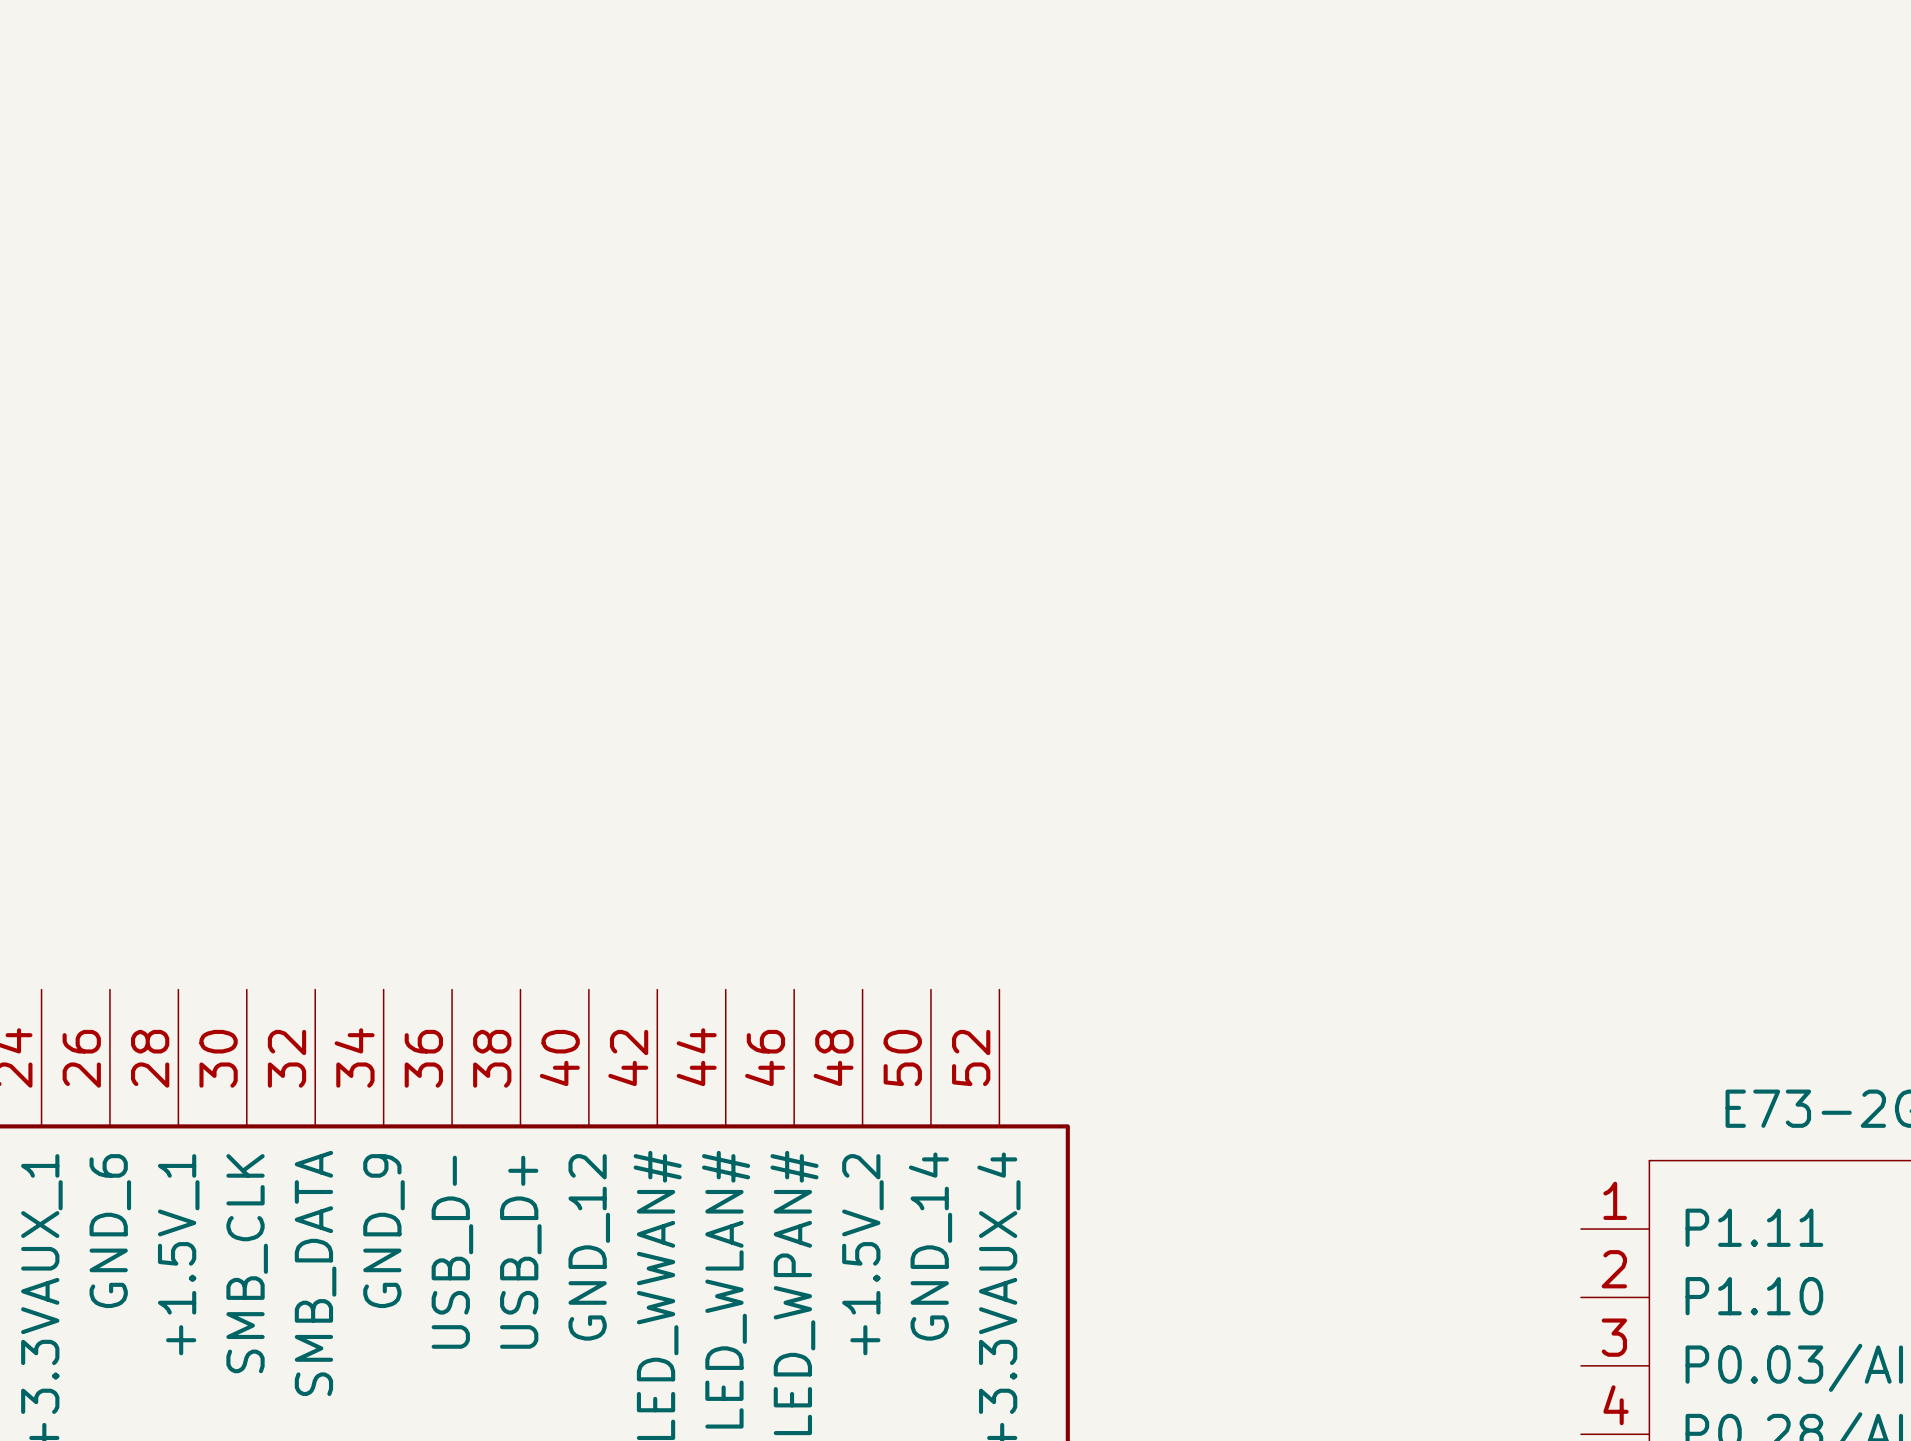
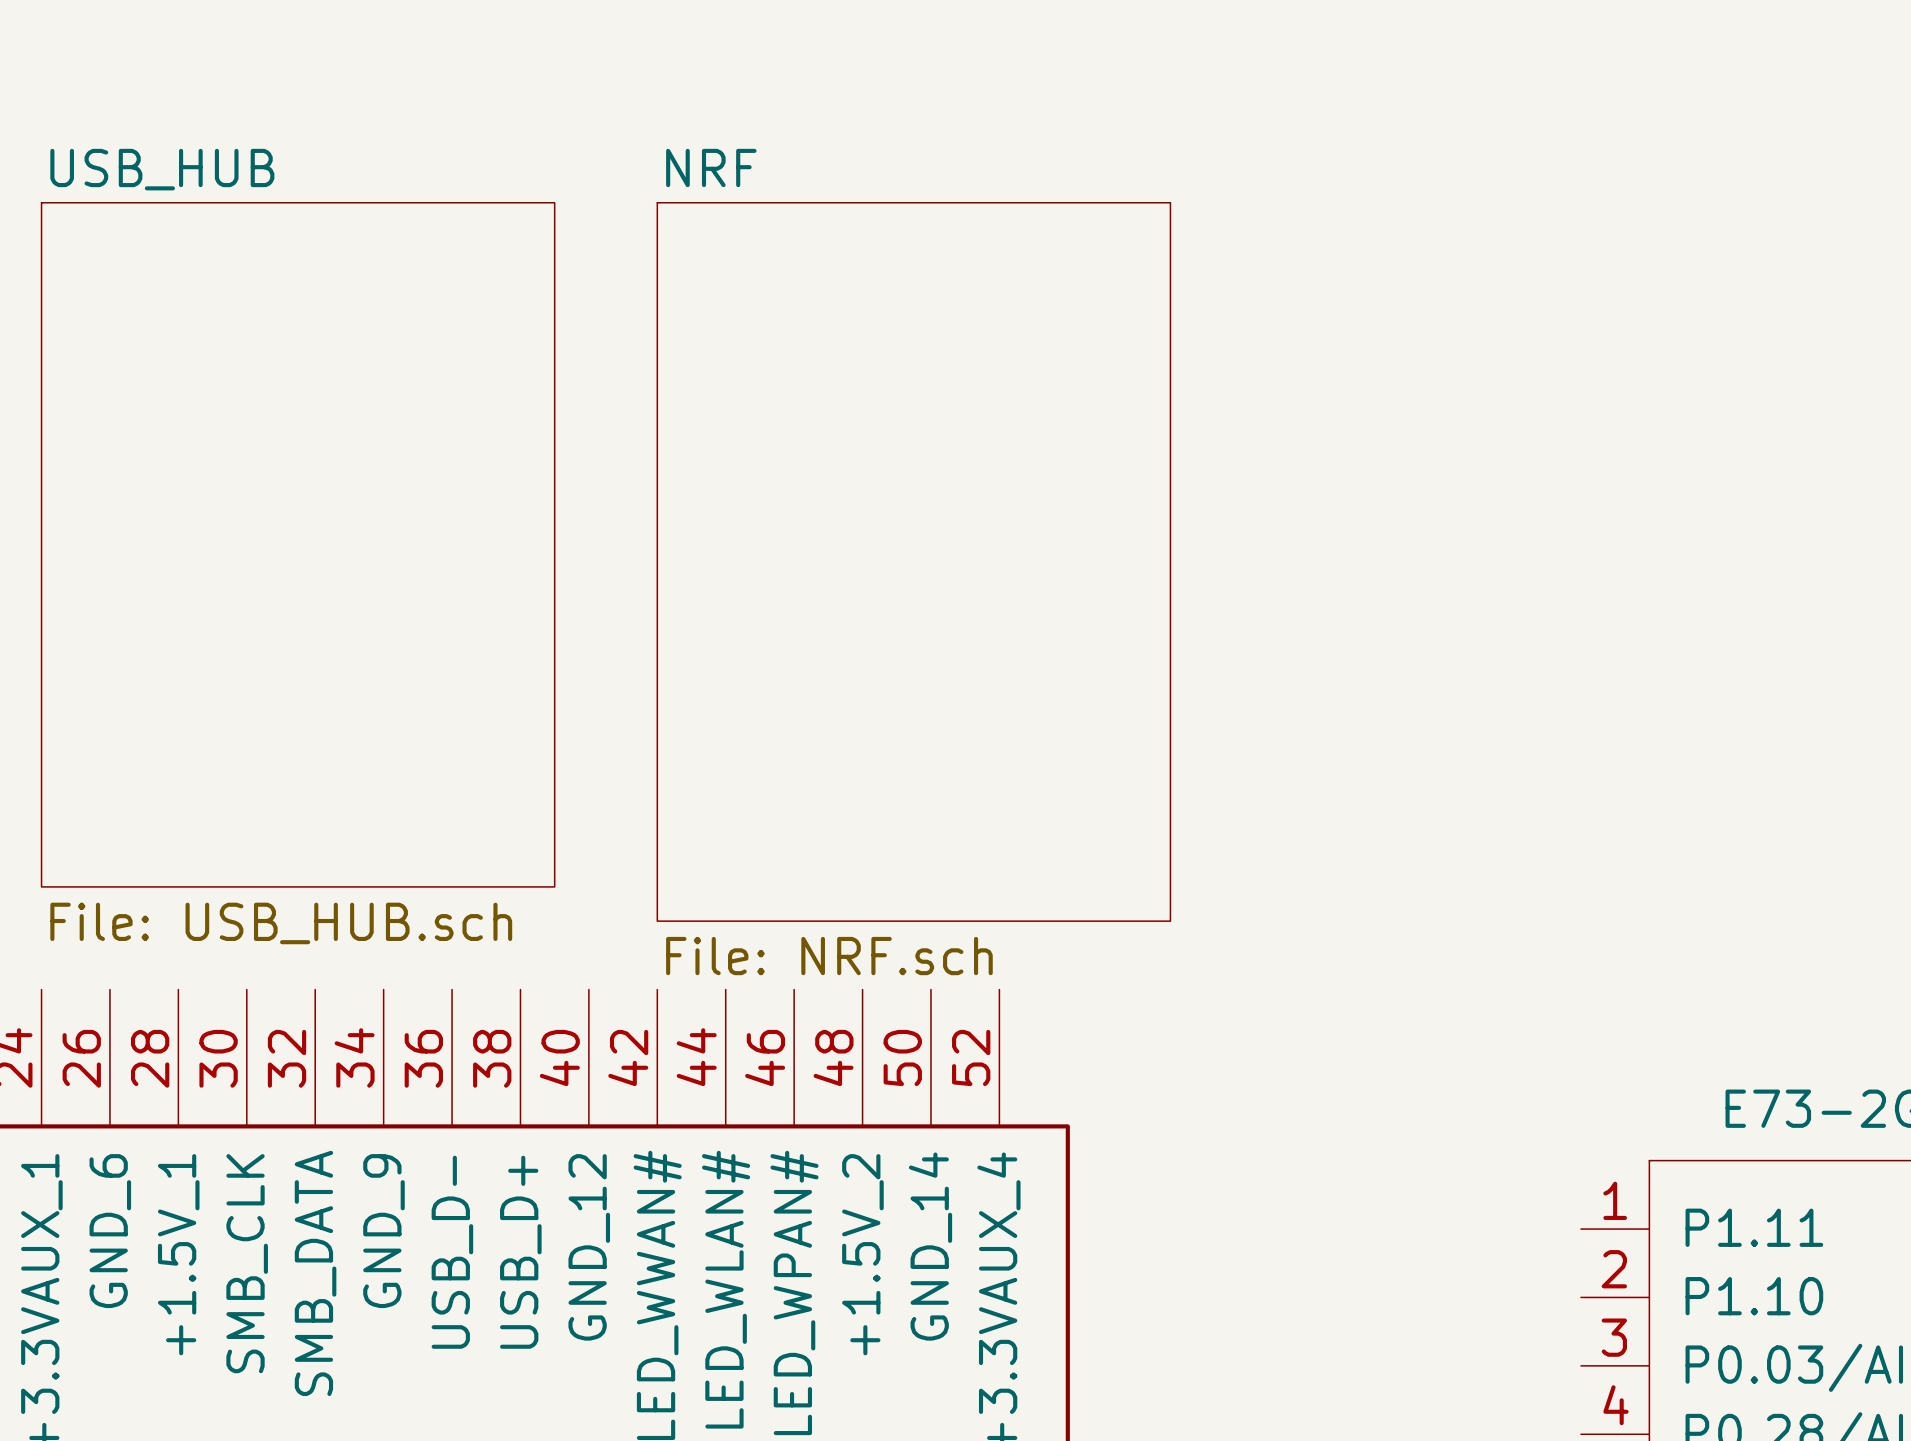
sheet USB_HUB: none -> File: USB_HUB.sch (298, 544)
sheet NRF: none -> File: NRF.sch (913, 561)

